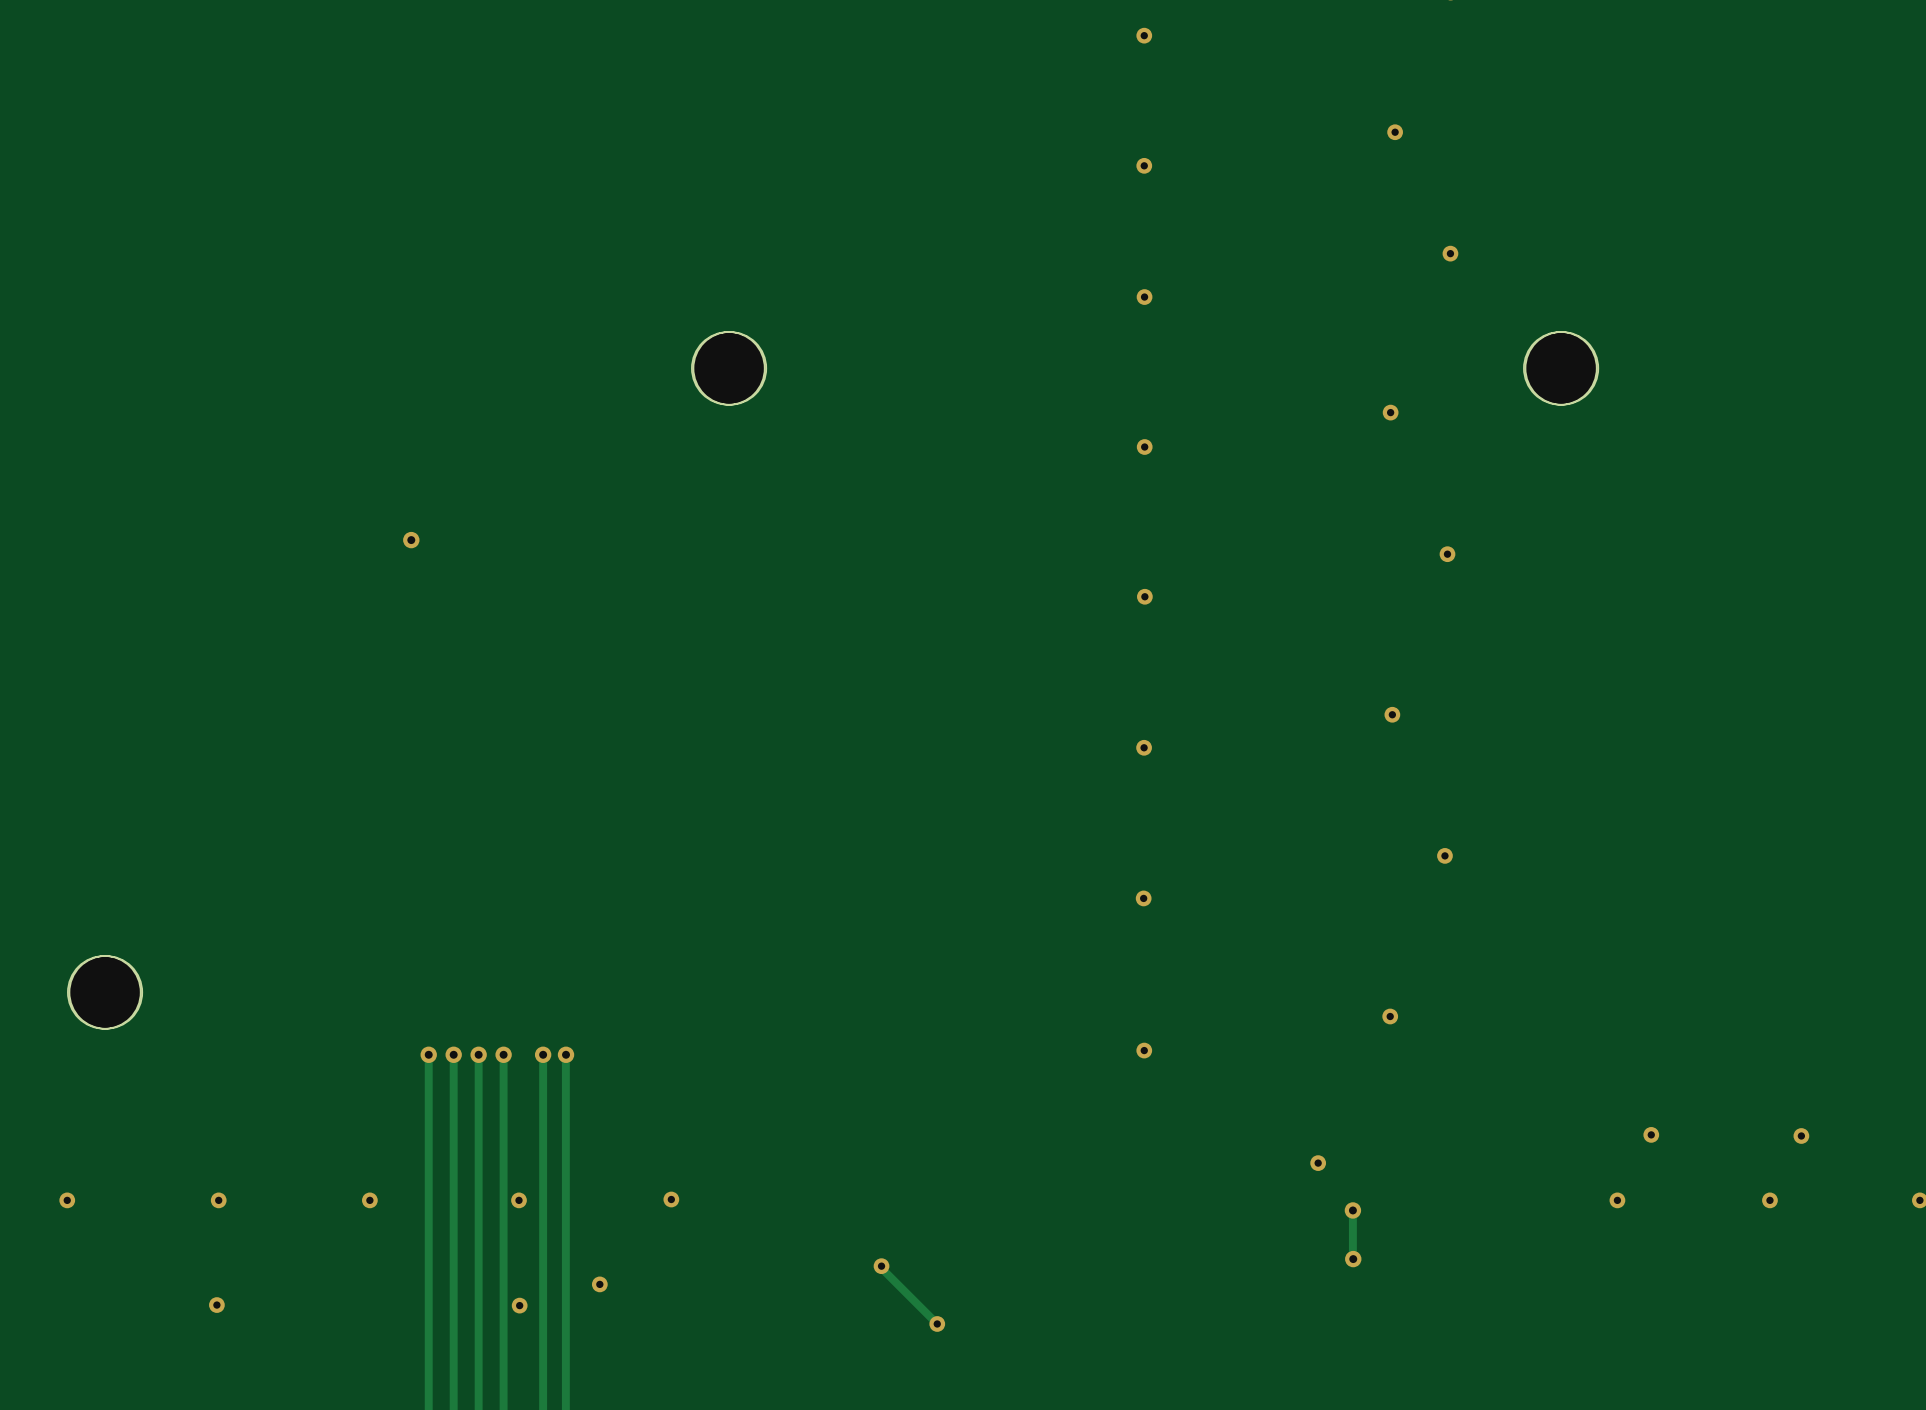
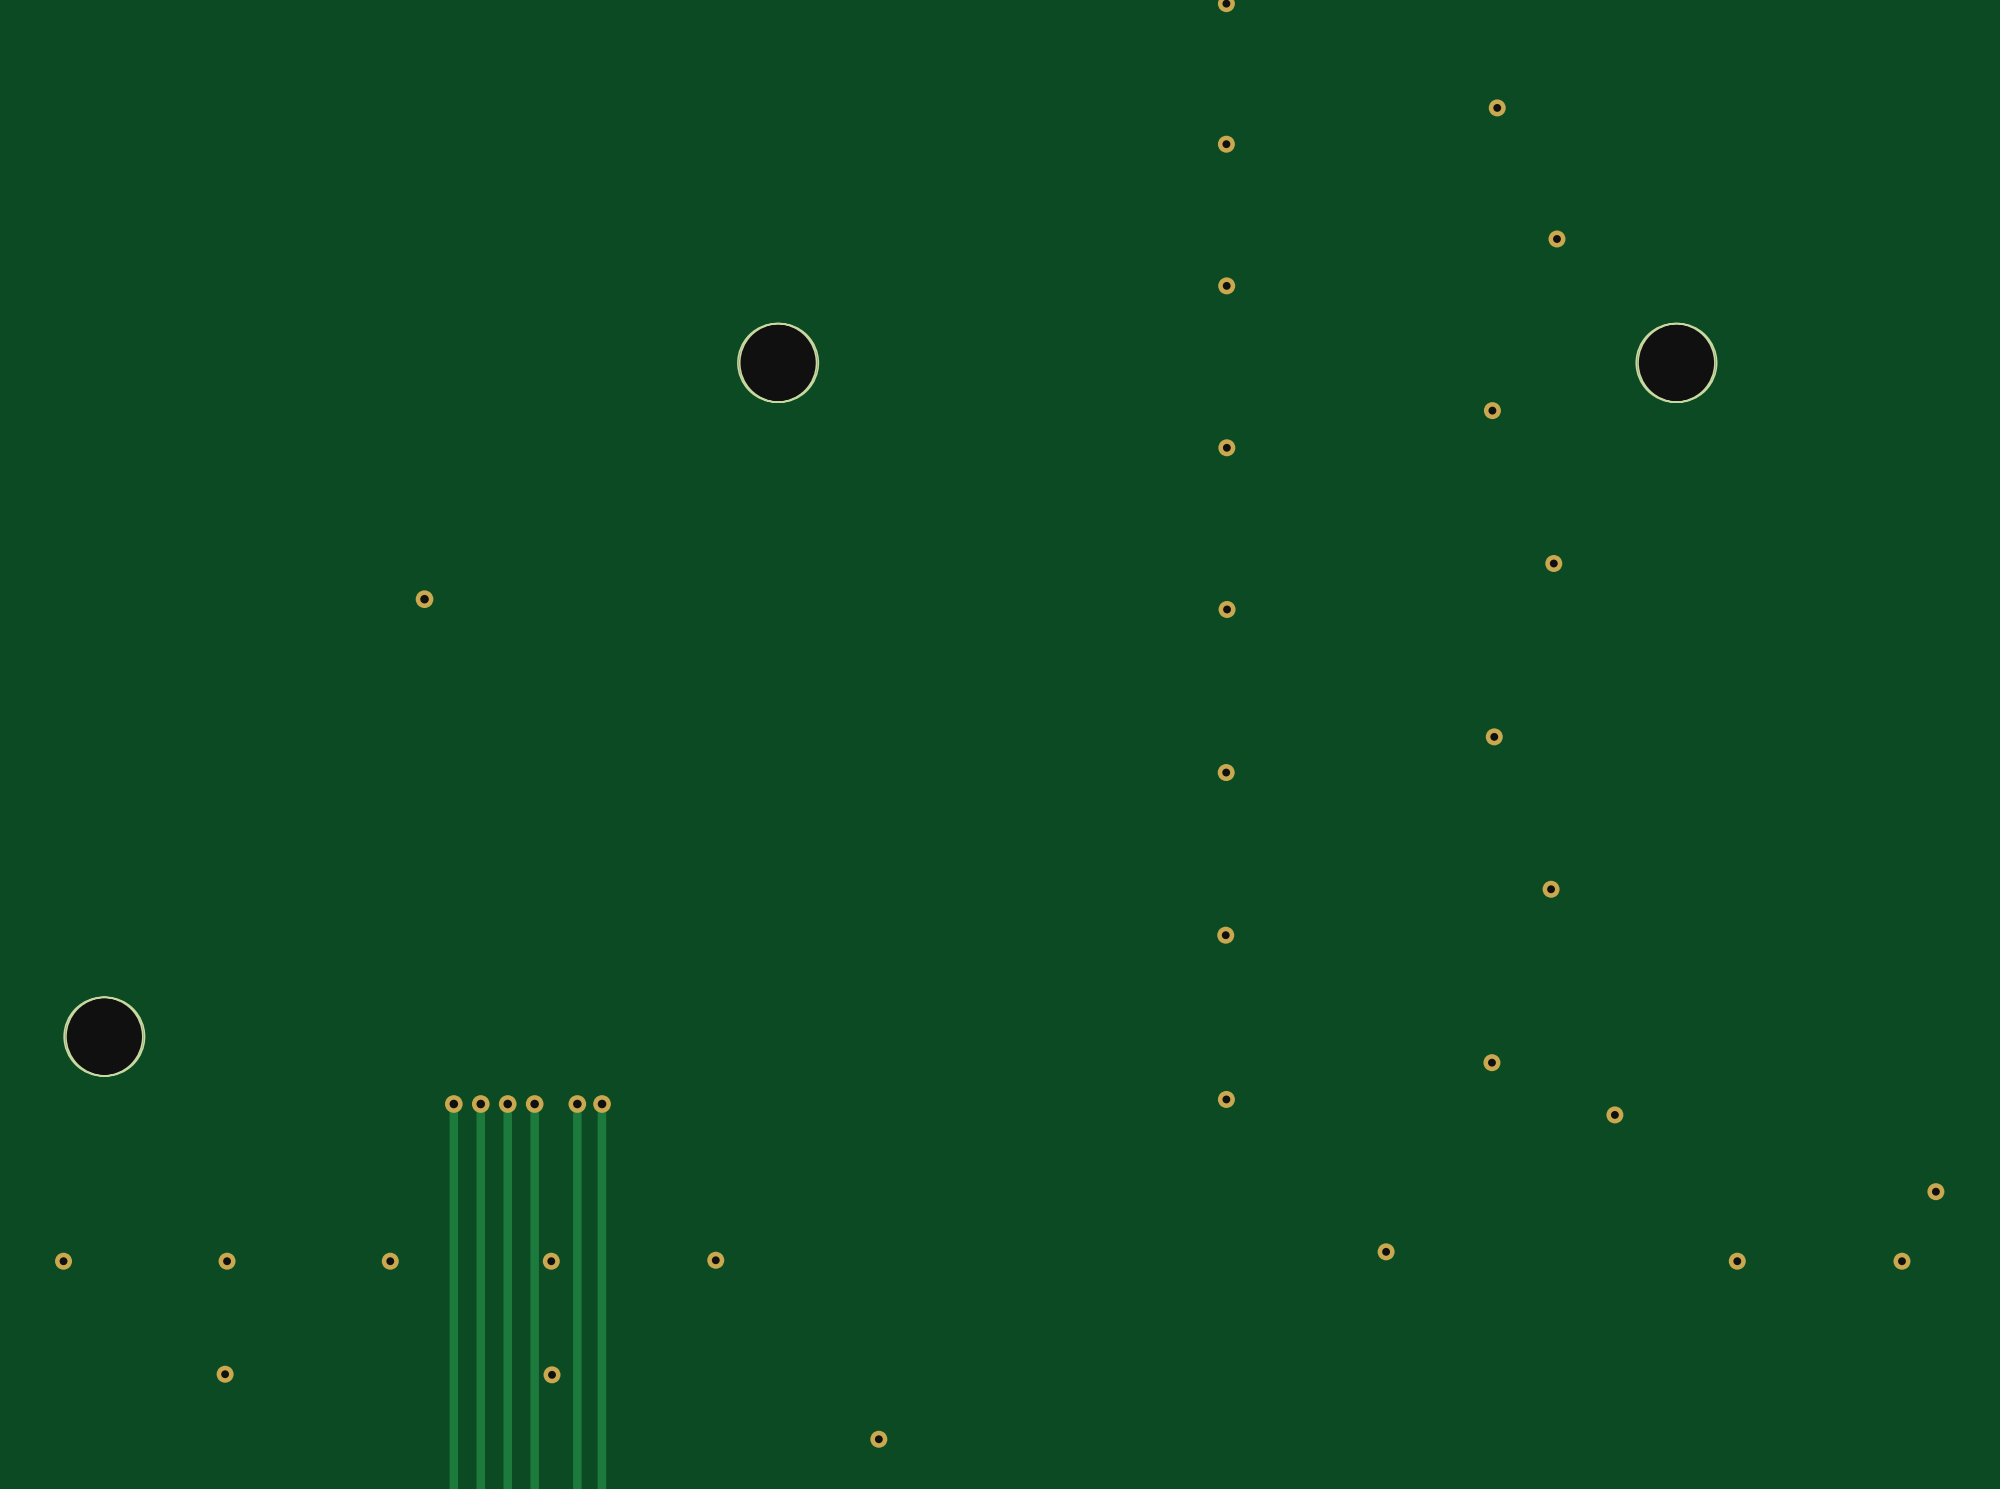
via position: (411, 540) -> (424, 599)
via: none -> (1614, 1114)
via: (1651, 1134) -> none
via position: (1318, 1163) -> (1386, 1251)
track: (1352, 1210) (1353, 1259) -> none
via: (1352, 1210) -> none
via: (1353, 1259) -> none
track: (881, 1266) (937, 1323) -> none
via: (881, 1266) -> none
via: (599, 1284) -> none
via: (937, 1323) -> none
via: none -> (878, 1439)

